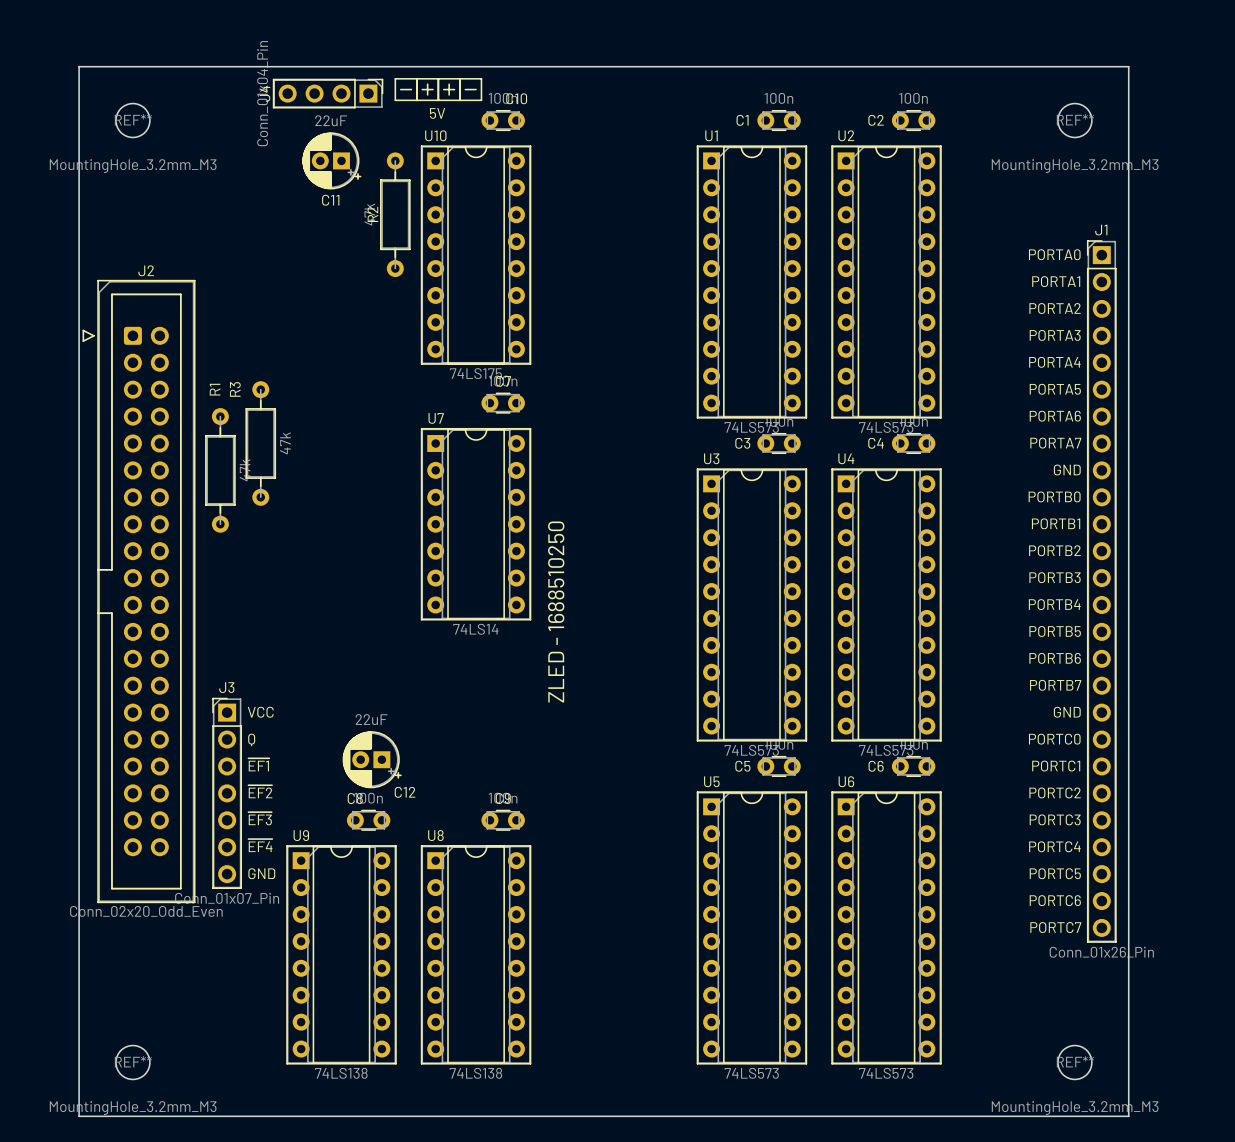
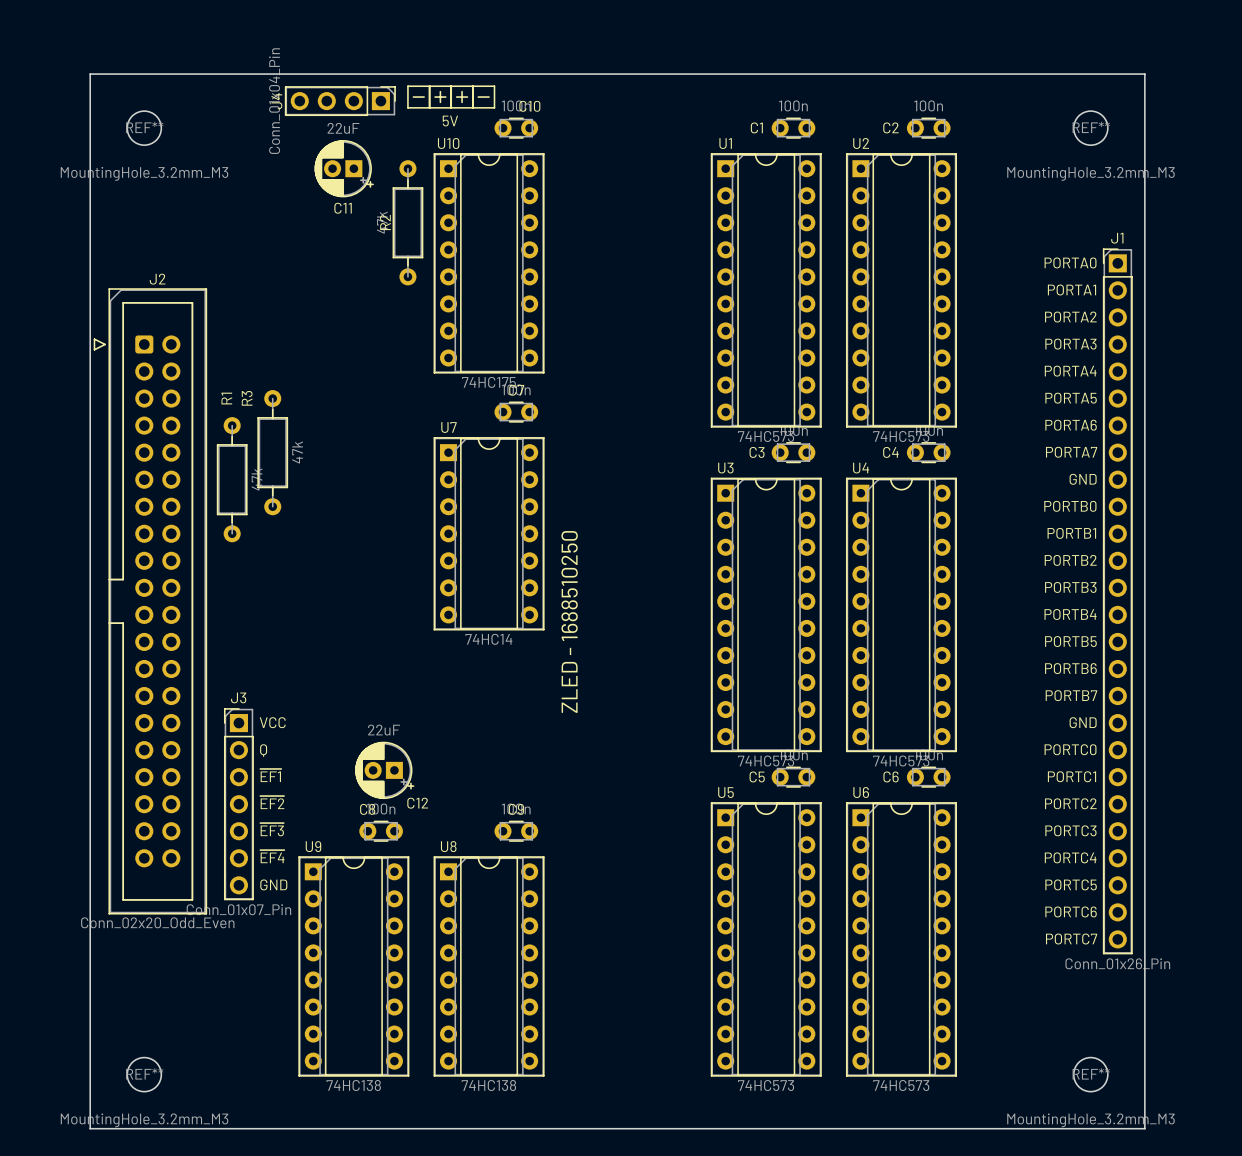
U10 value: 74LS175 (475, 373) -> 74HC175 (488, 382)
U1 value: 74LS573 (751, 427) -> 74HC573 (766, 436)
U2 value: 74LS573 (886, 427) -> 74HC573 (901, 436)
U7 value: 74LS14 (475, 629) -> 74HC14 (488, 639)
U3 value: 74LS573 (751, 750) -> 74HC573 (766, 761)
U4 value: 74LS573 (886, 750) -> 74HC573 (901, 761)
U9 value: 74LS138 (341, 1073) -> 74HC138 (353, 1085)
U8 value: 74LS138 (475, 1073) -> 74HC138 (488, 1085)
U5 value: 74LS573 (751, 1073) -> 74HC573 (766, 1085)
U6 value: 74LS573 (886, 1073) -> 74HC573 (901, 1085)

